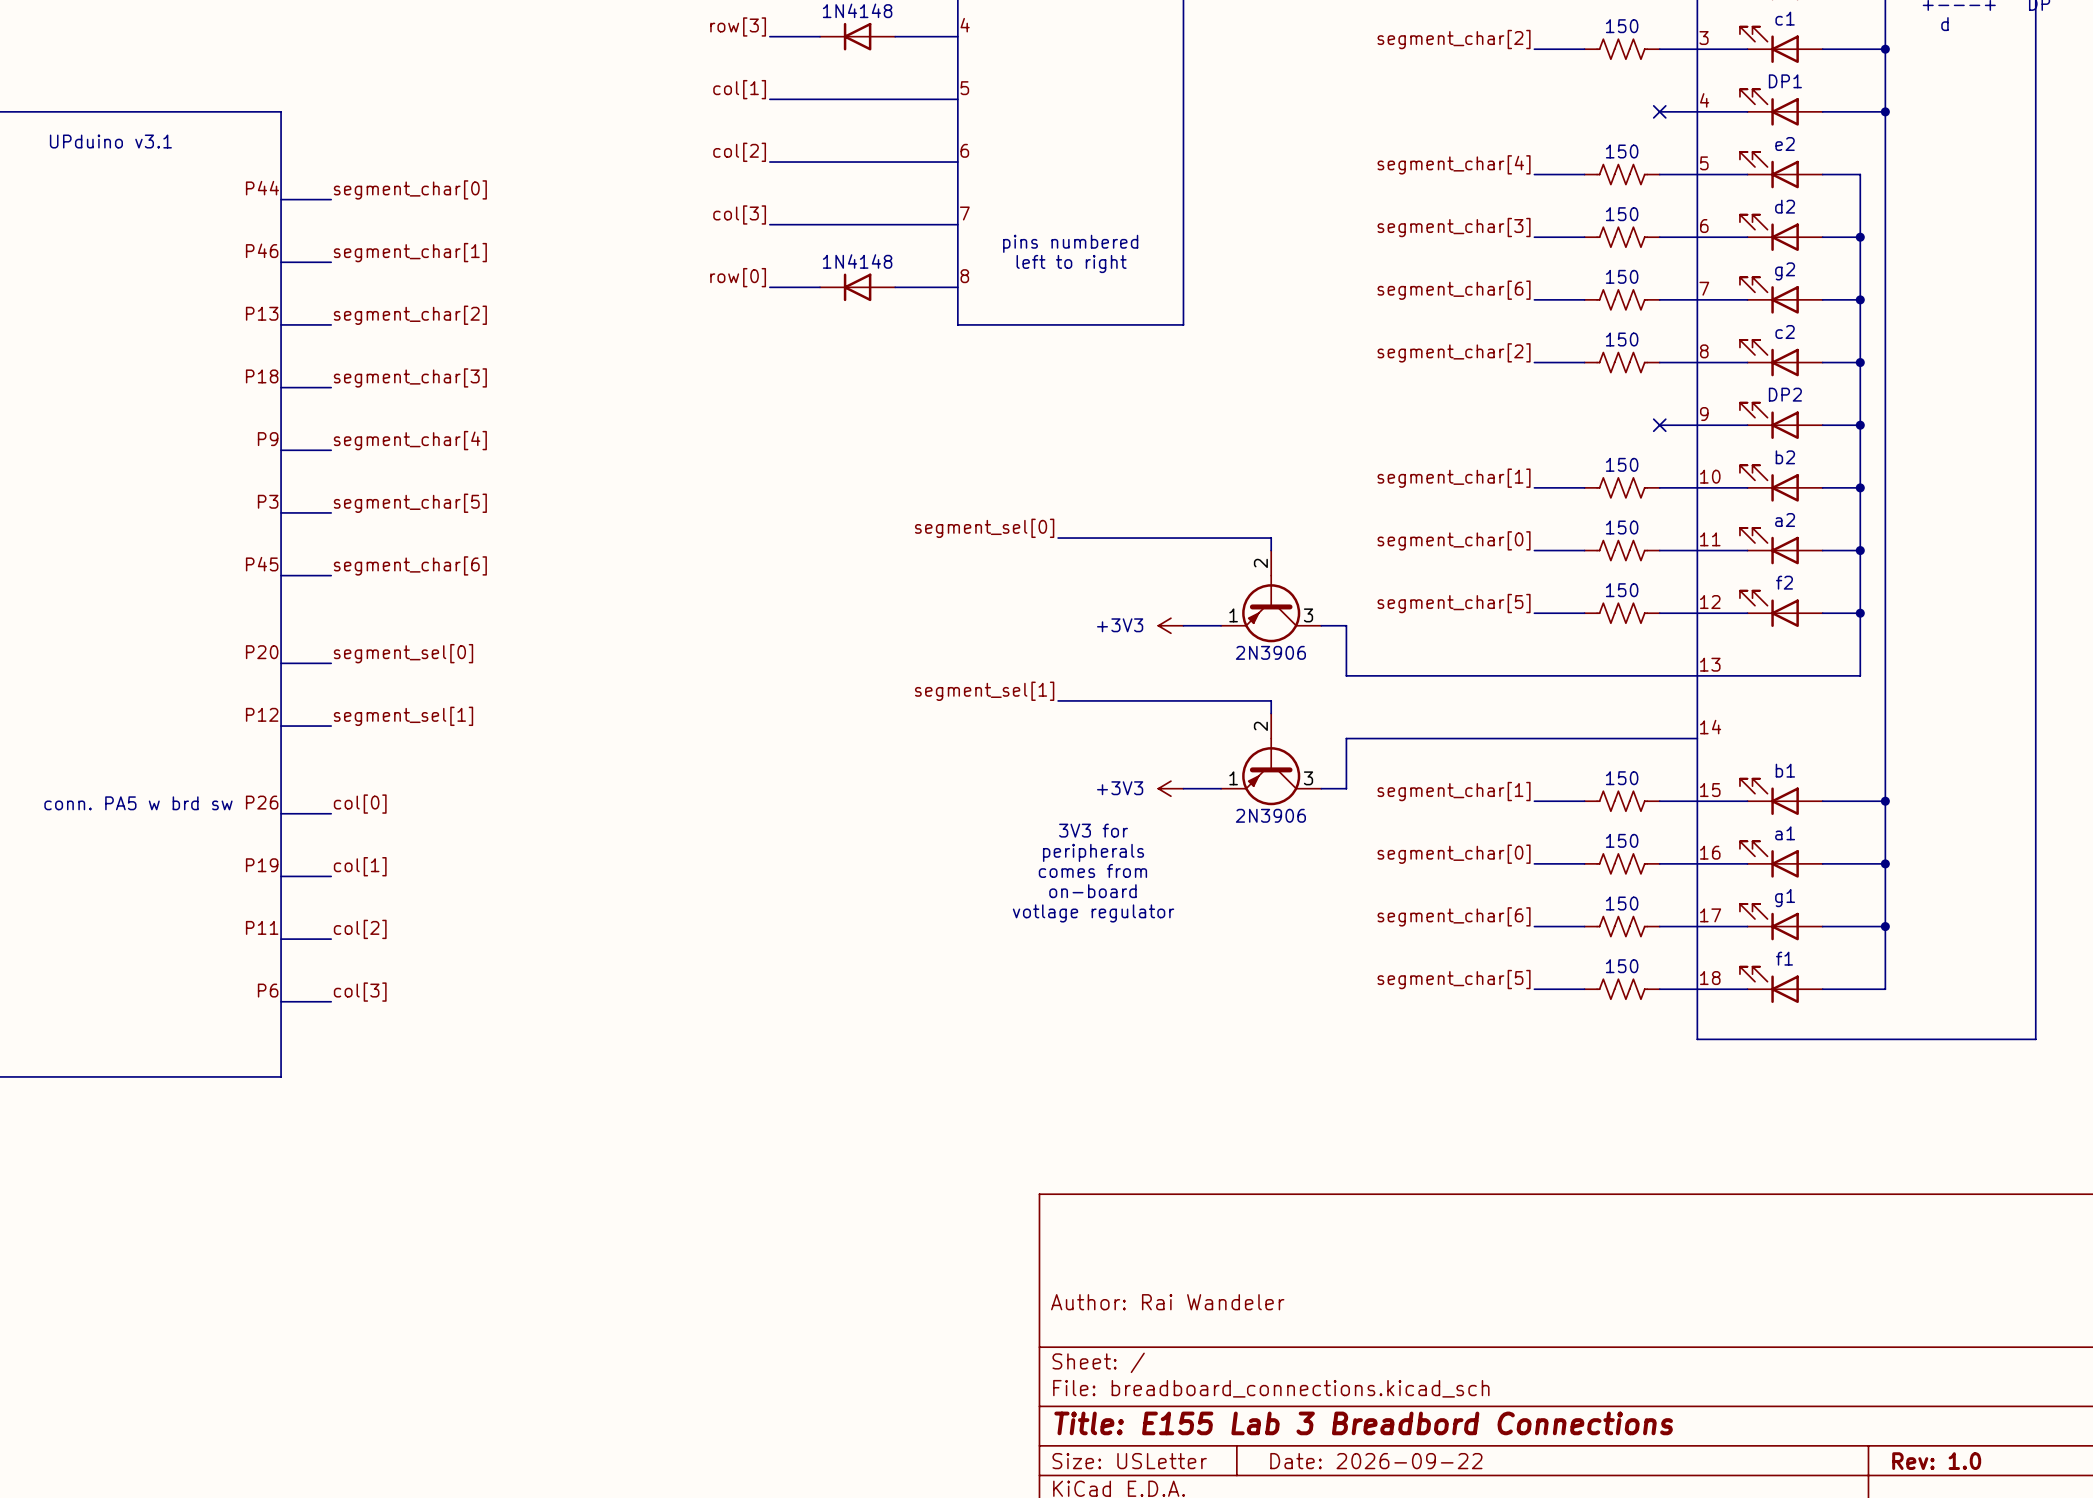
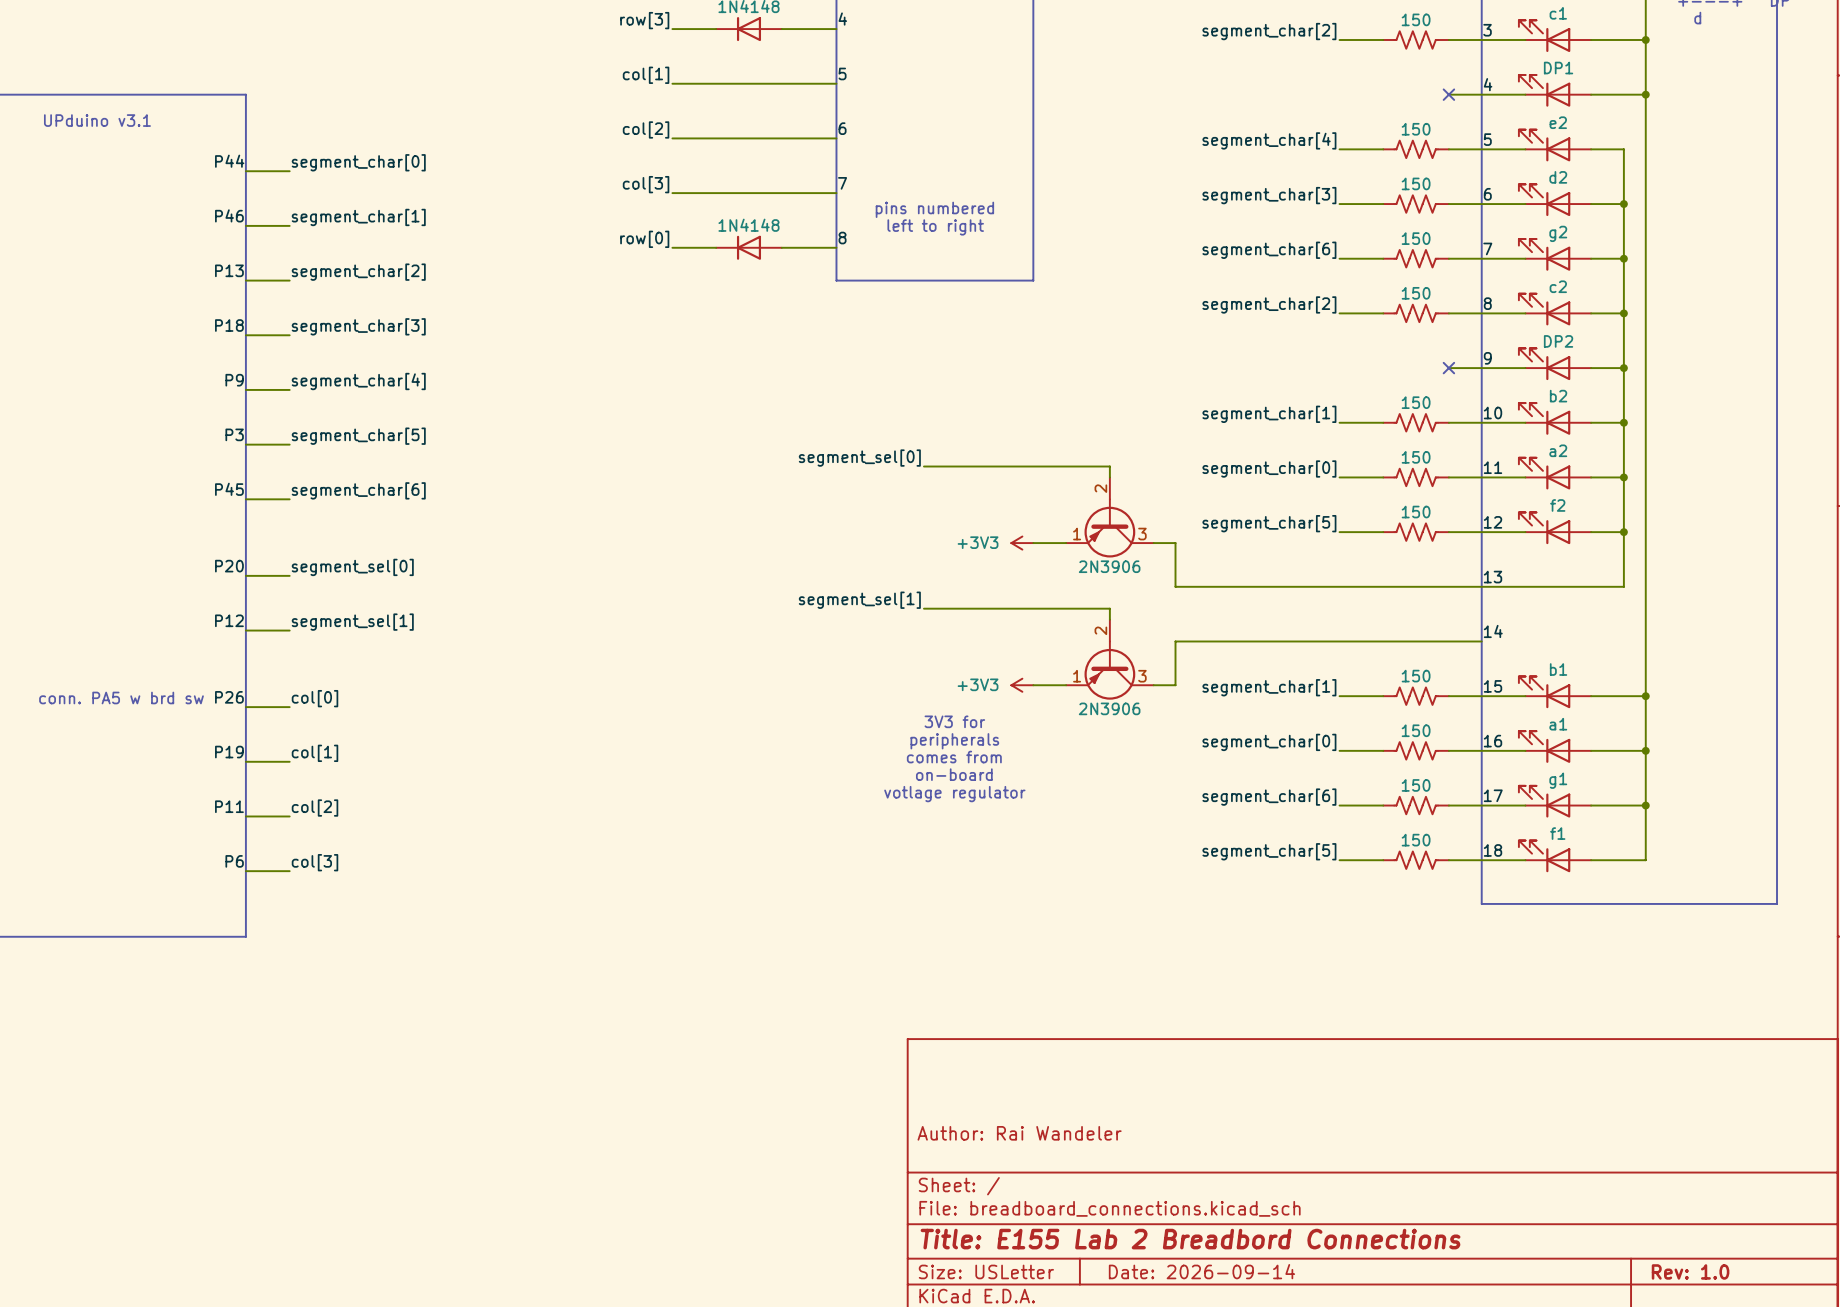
title block: Title: E155 Lab 3 Breadbord Connections (1363, 1423) -> Title: E155 Lab 2 Breadbord Connections (1190, 1239)
title block: Date: 2026-09-22 (1376, 1461) -> Date: 2026-09-14 (1201, 1271)

